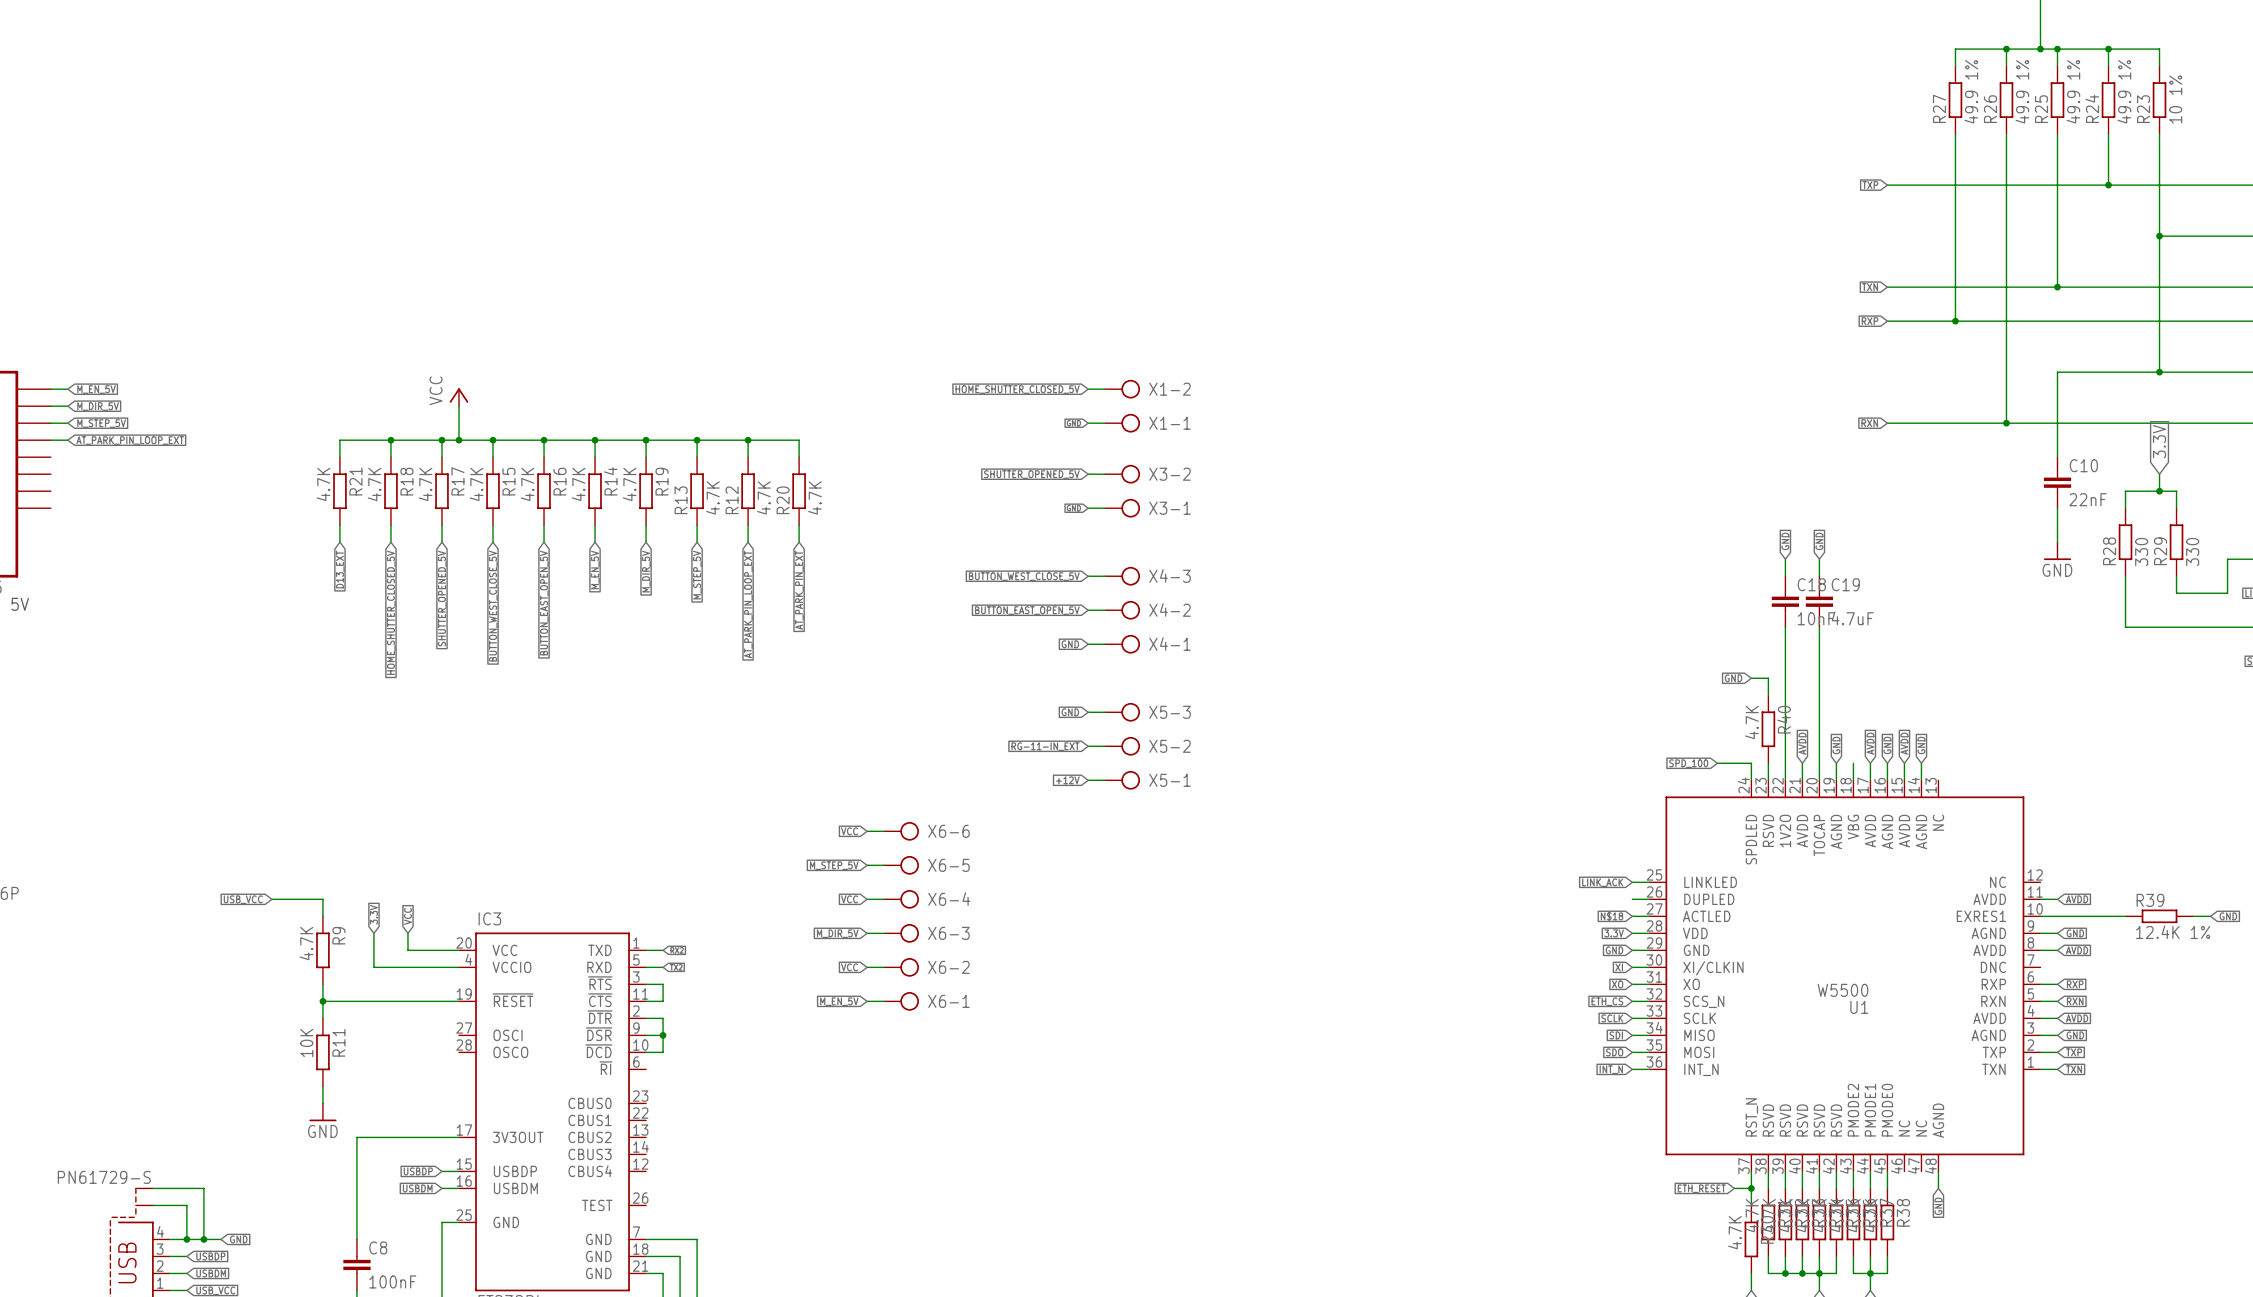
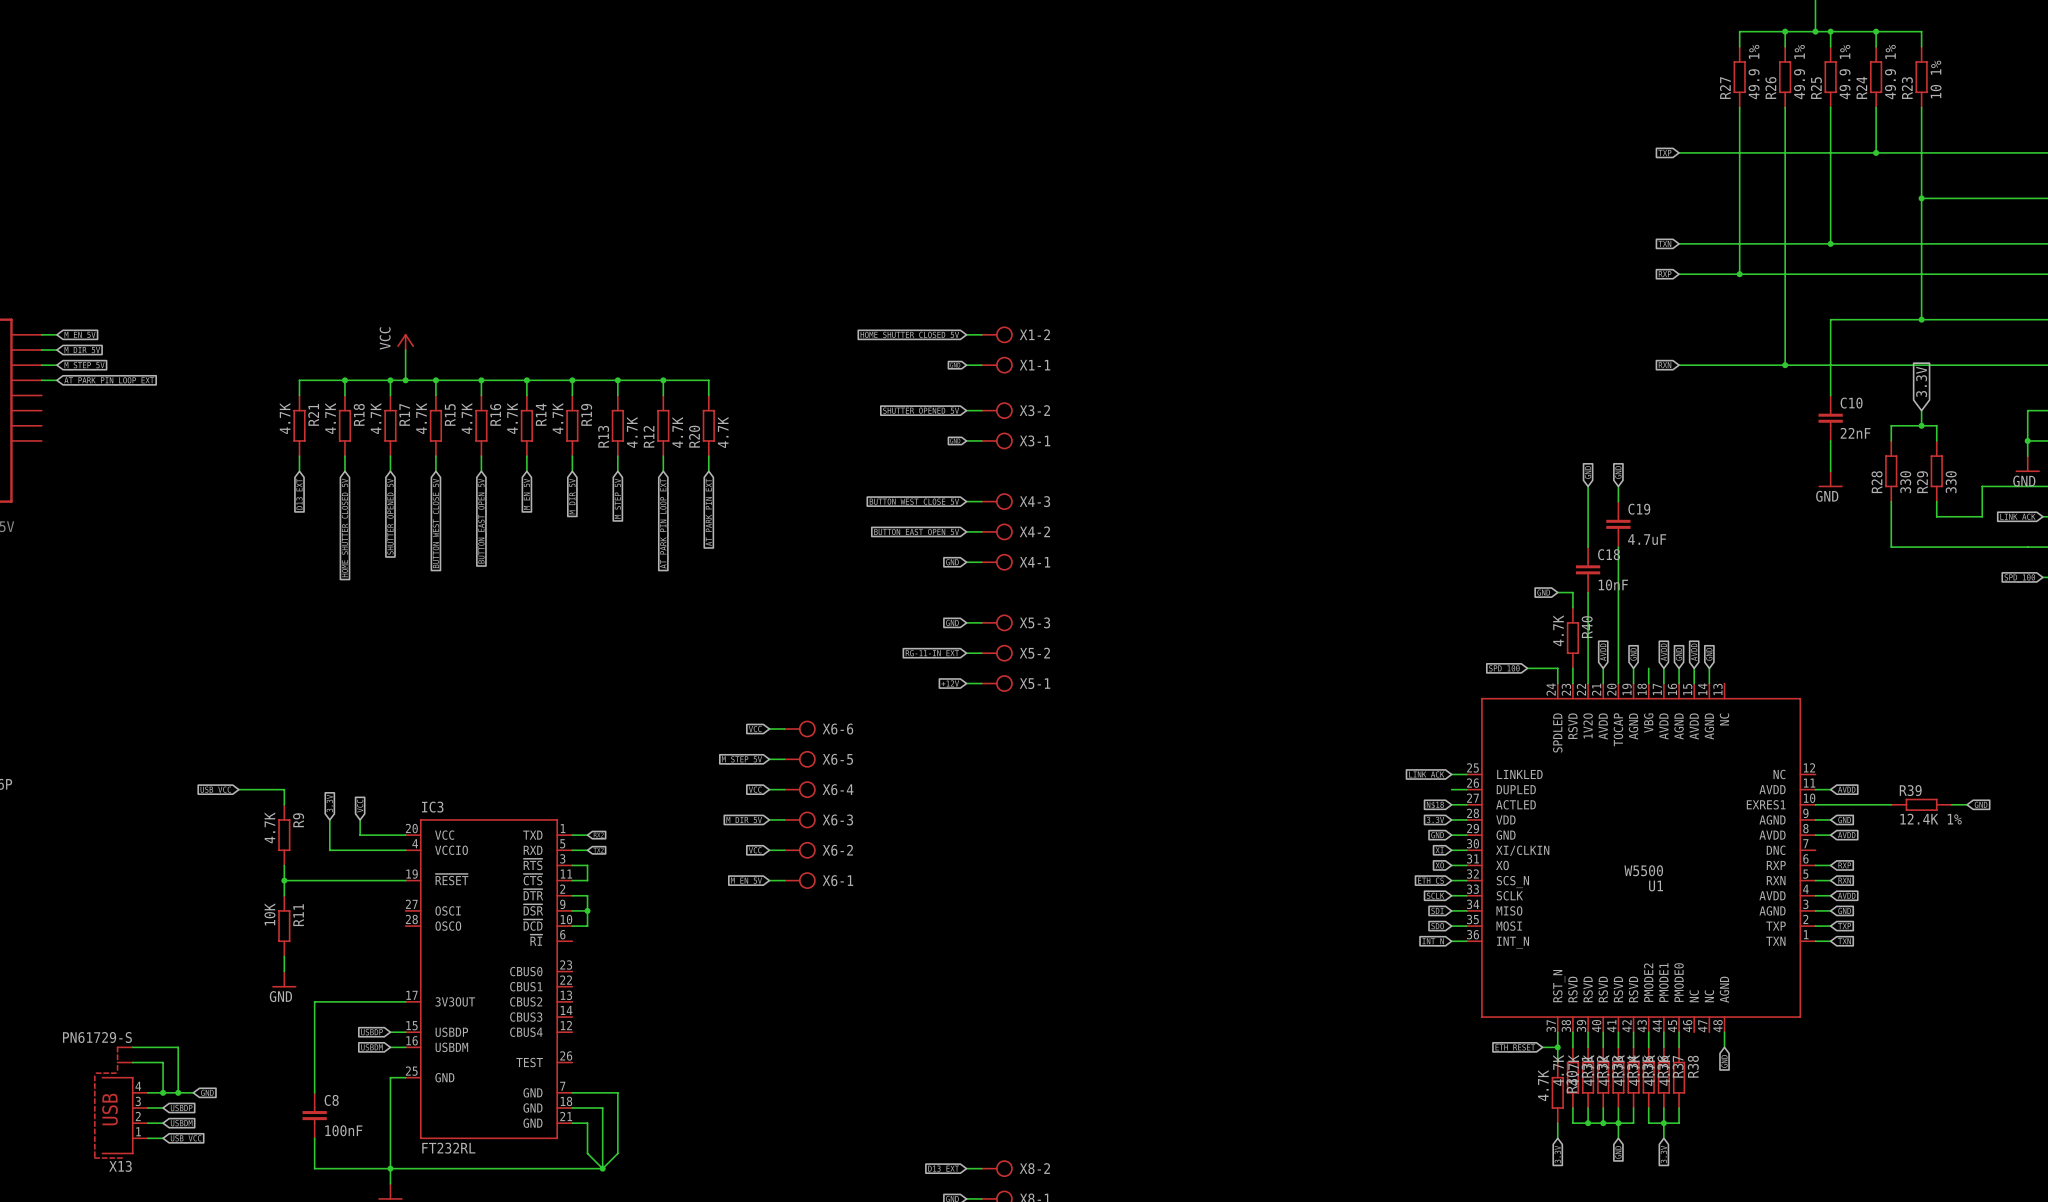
C18 position: (1785, 601) -> (1588, 569)

